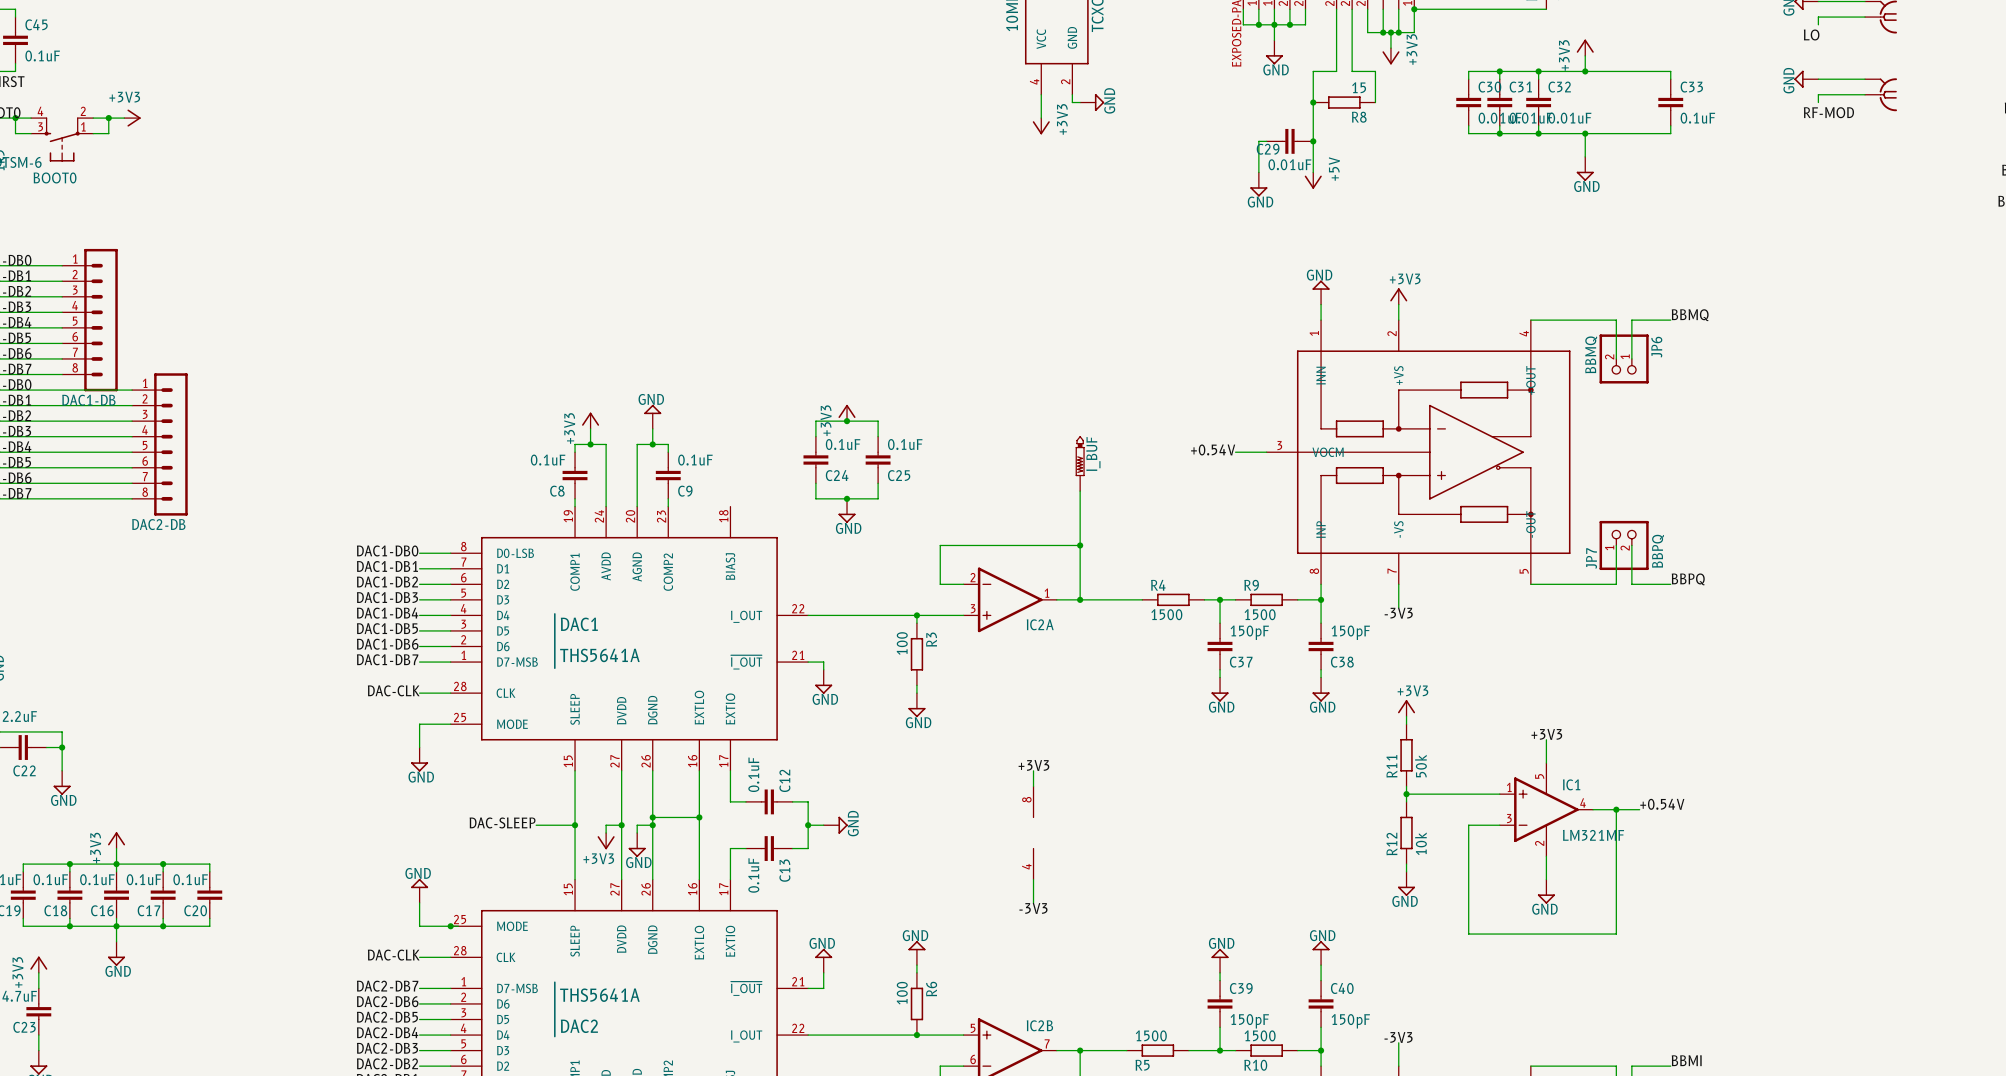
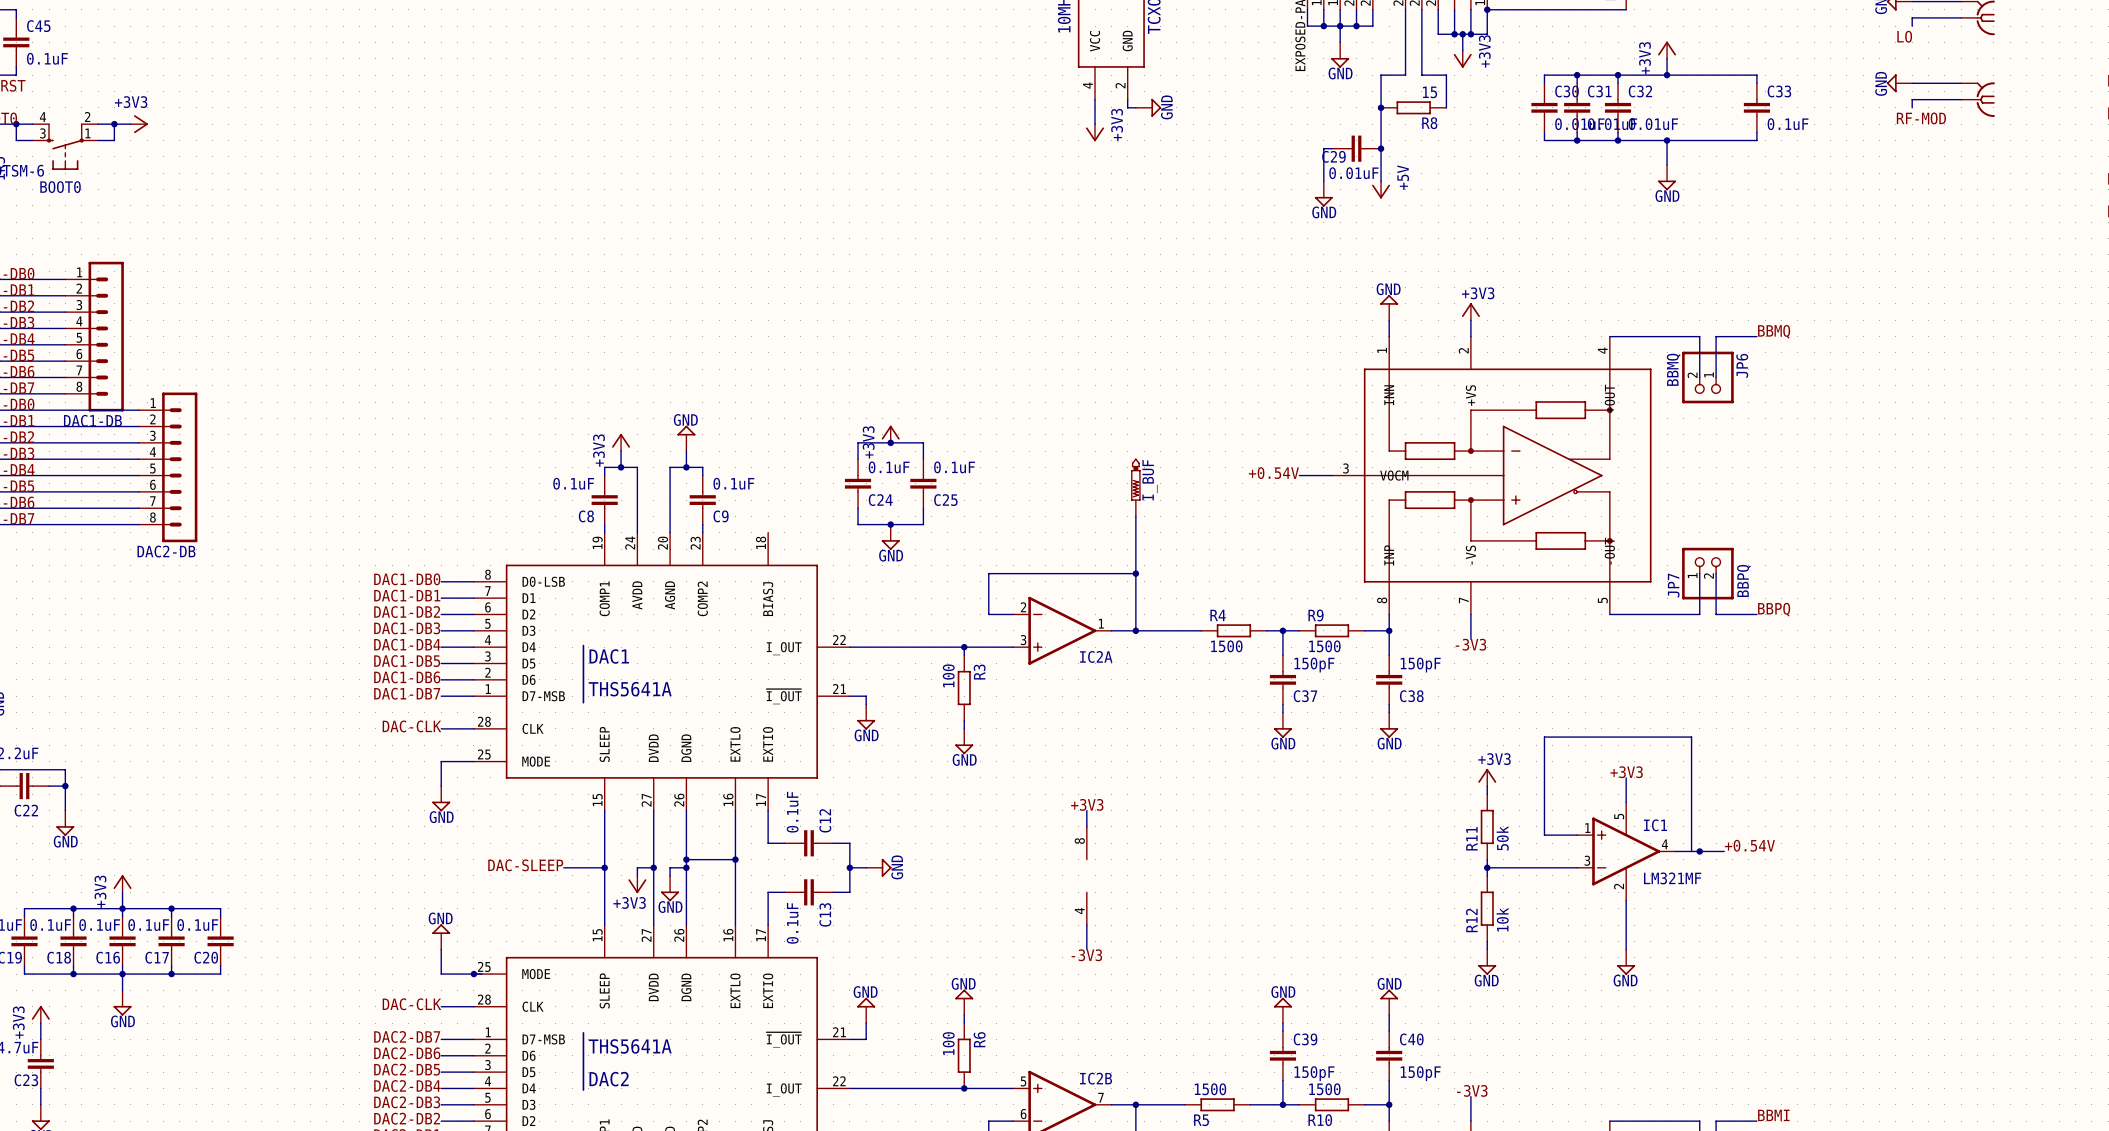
power symbol position: +3V3 (1406, 708) -> +3V3 (1487, 777)
wire: (1406, 716) (1406, 724) -> (1487, 786) (1487, 794)
R11 position: (1406, 755) -> (1487, 826)
wire: (1406, 786) (1406, 801) -> (1487, 859) (1487, 875)
wire: (1406, 794) (1468, 794) -> (1691, 851) (1691, 737) (1544, 737) (1544, 835)
junction position: (1406, 794) -> (1487, 867)
wire: (1616, 809) (1616, 934) (1468, 934) (1468, 825) -> (1487, 867) (1544, 867)
R12 position: (1406, 833) -> (1487, 908)
wire: (1406, 864) (1406, 871) -> (1487, 941) (1487, 949)
power symbol position: GND (1406, 883) -> GND (1487, 962)
power symbol position: GND (1546, 891) -> GND (1626, 962)

